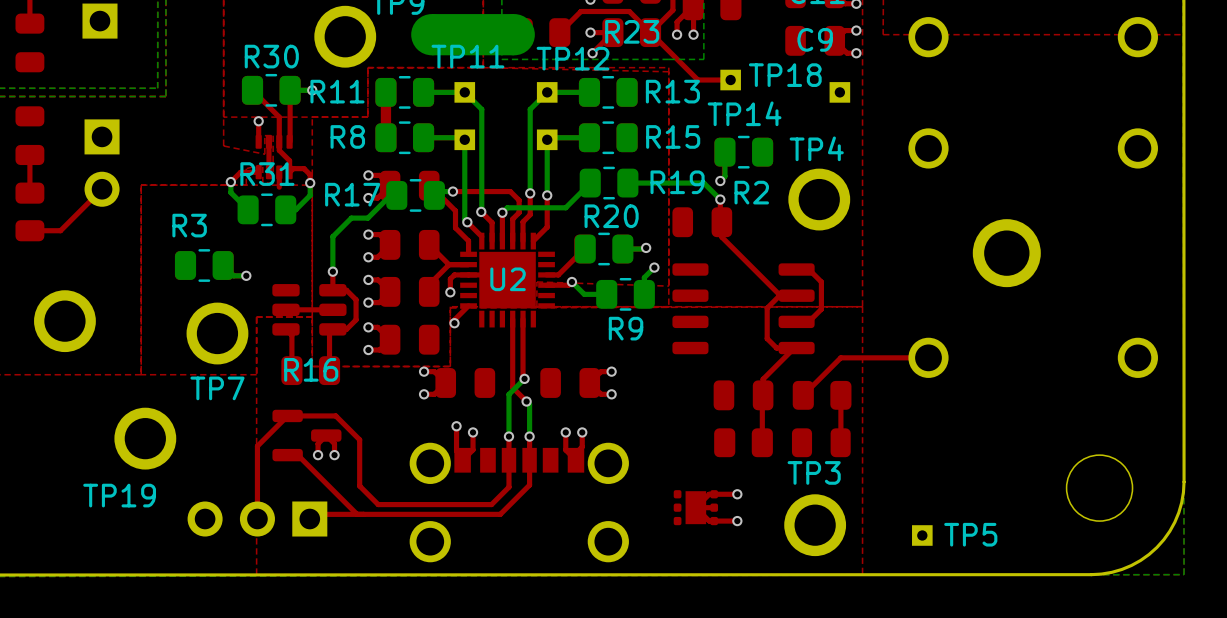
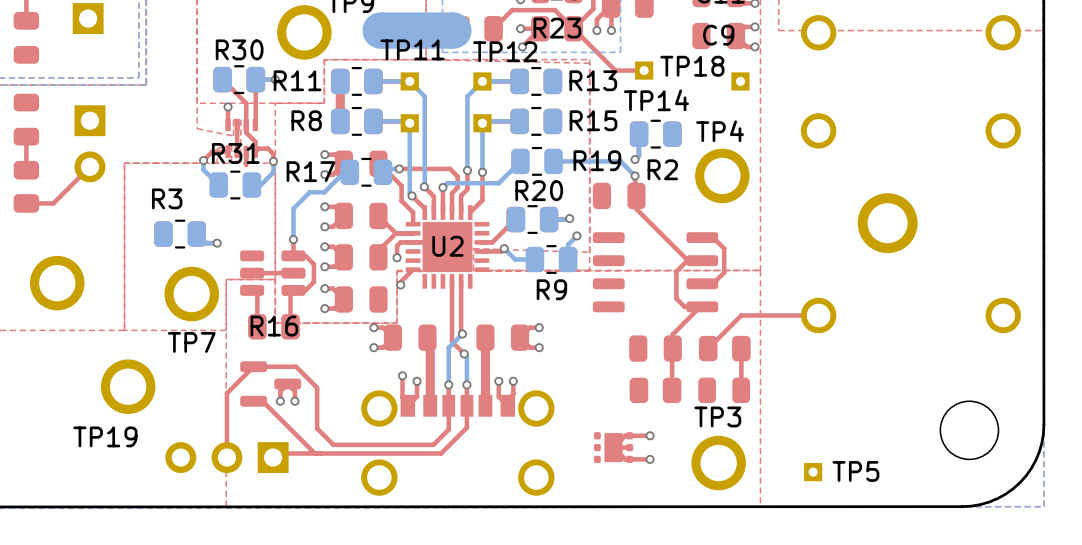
top track: none -> (485, 337) (485, 405)
top track: none -> (430, 340) (430, 405)

